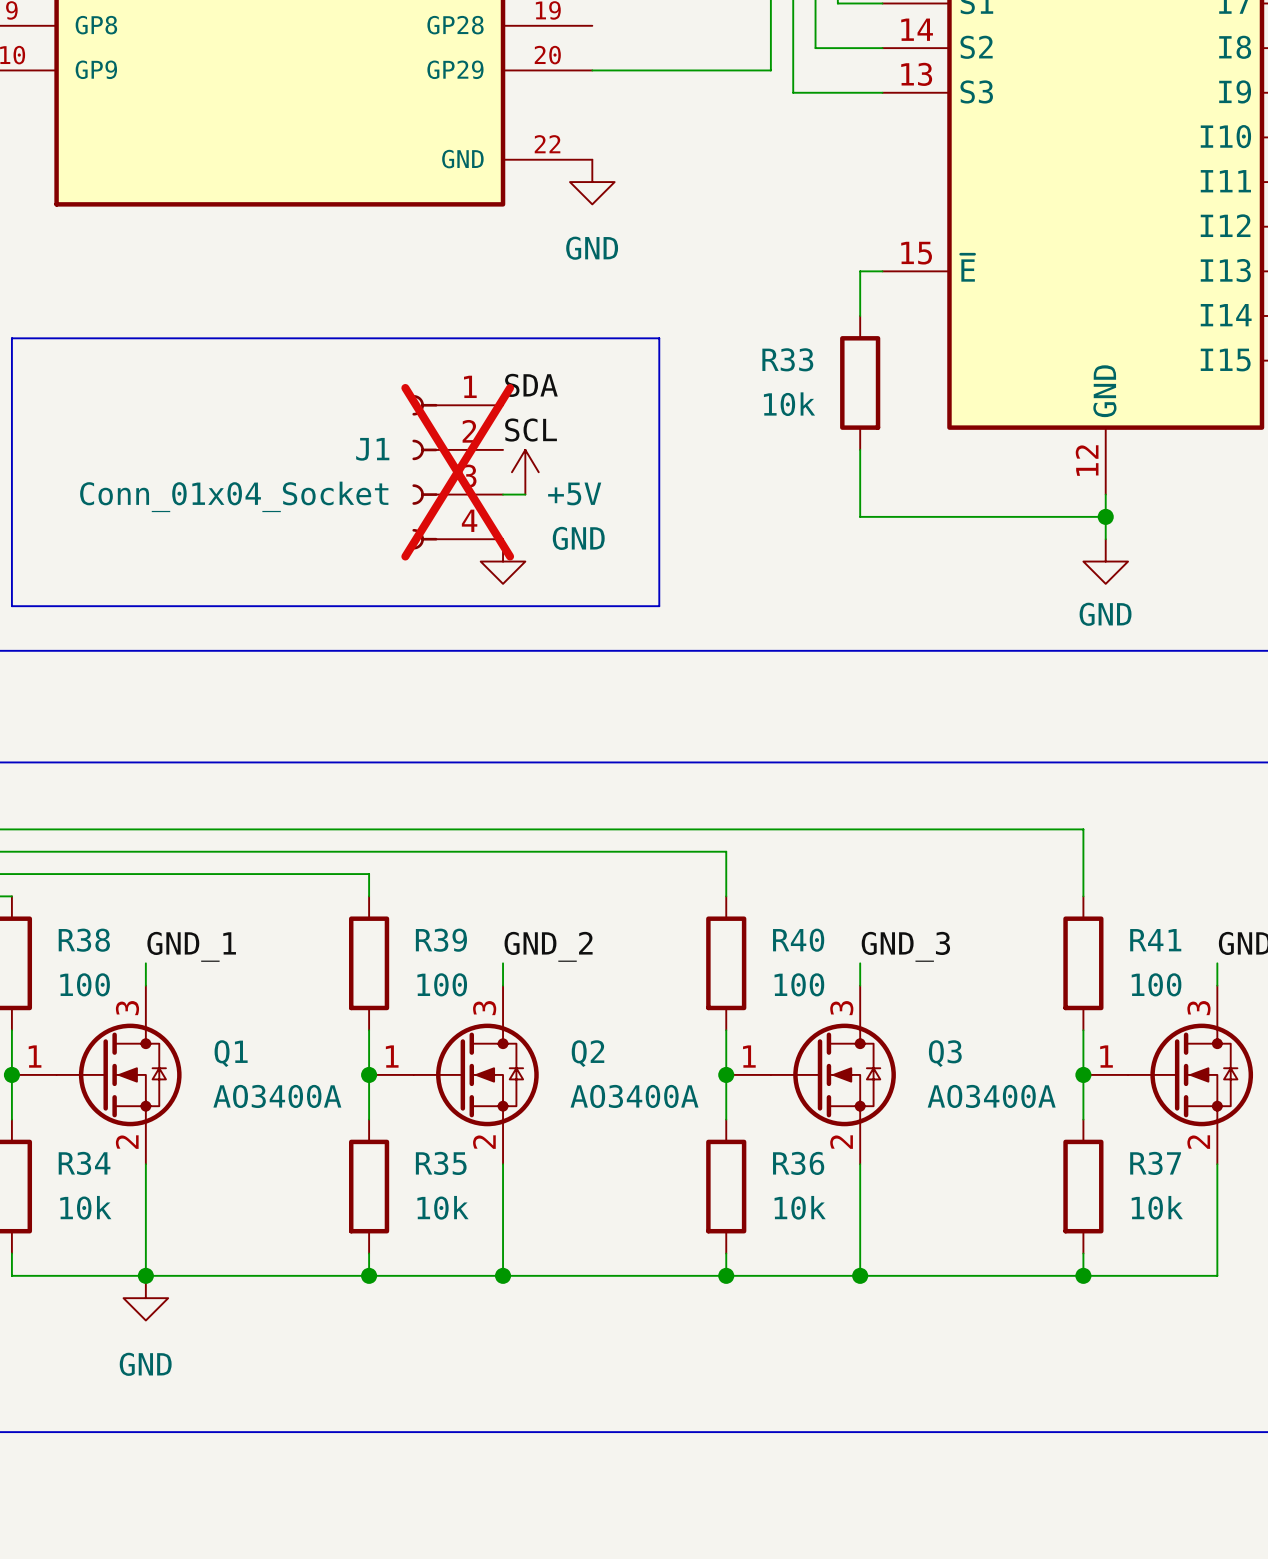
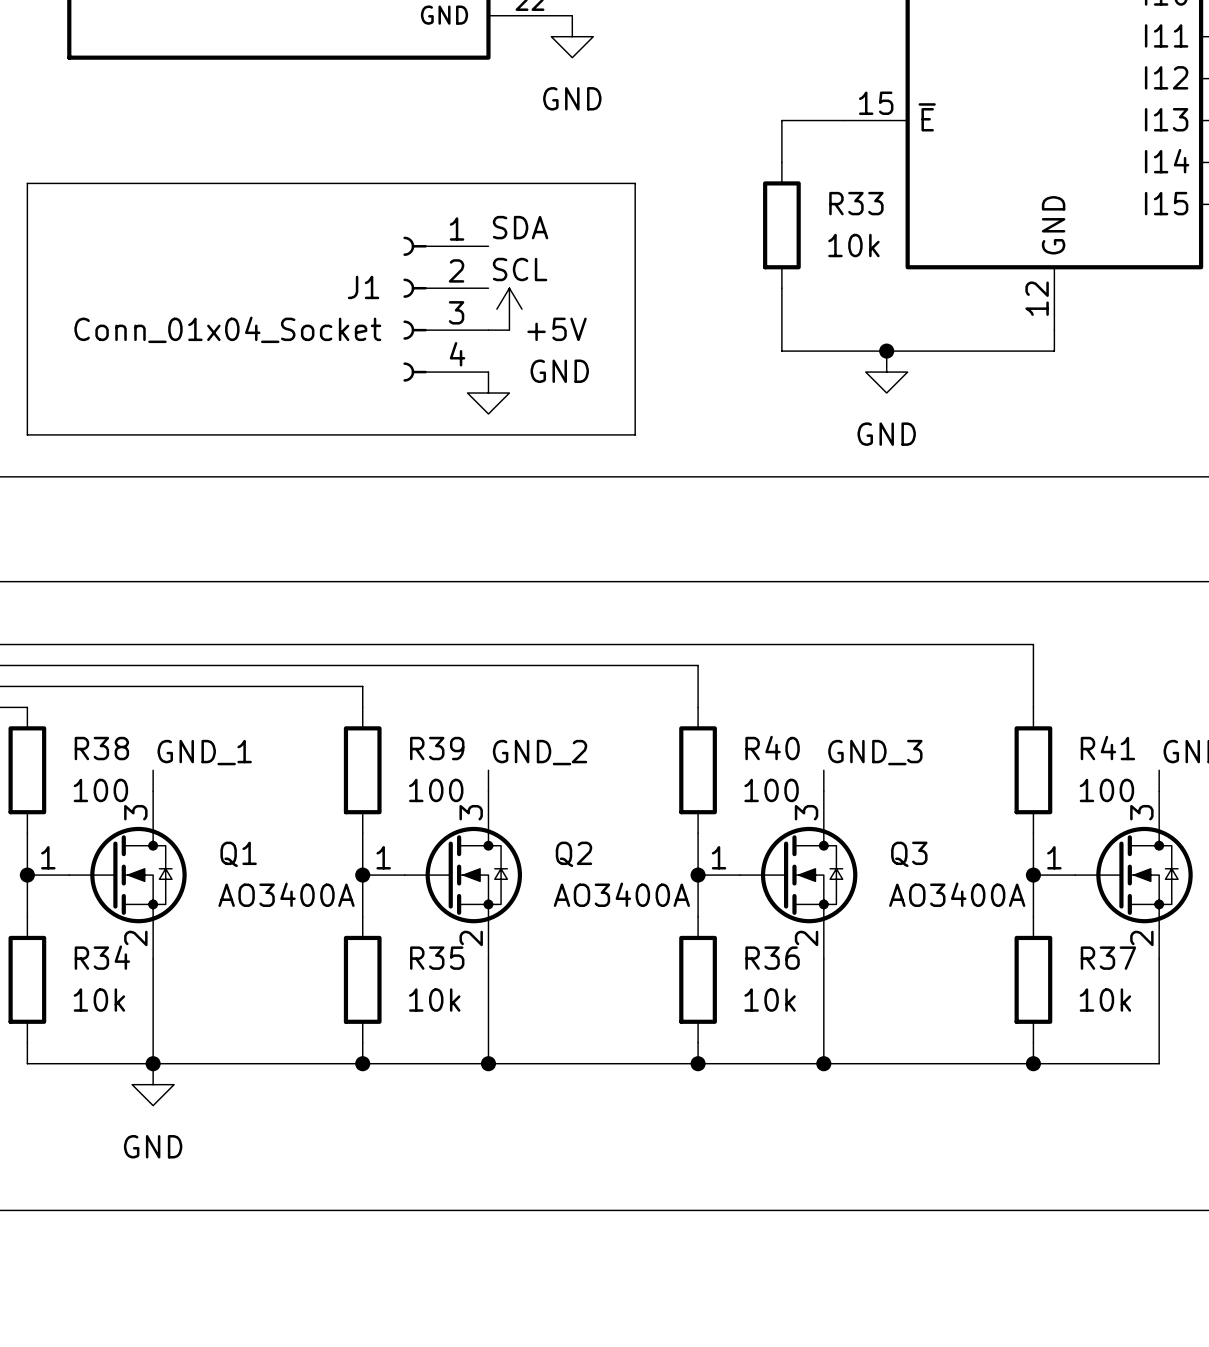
wire: (860, 271) (860, 315) -> (823, 120) (781, 120) (781, 162)
R33 name position: R33 (787, 359) -> R33 (856, 203)
R33 position: (860, 382) -> (781, 225)
R33 value position: 10k (789, 404) -> 10k (853, 245)
wire: (860, 449) (860, 516) -> (781, 288) (781, 351) (823, 351)
J1 do-not-place cross: (457, 472) -> none
junction: none -> (886, 351)
wire: (1105, 516) (1105, 539) -> none
junction: (1105, 516) -> none
power symbol position: GND (1105, 561) -> GND (886, 372)
power symbol text position: GND (1105, 614) -> GND (886, 434)

